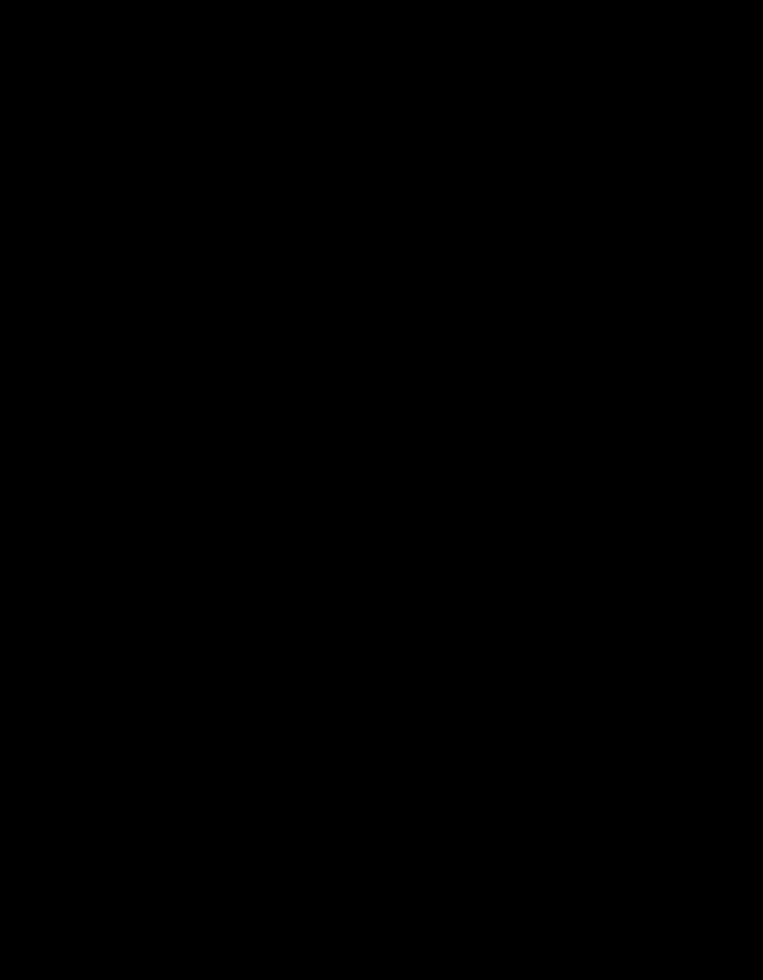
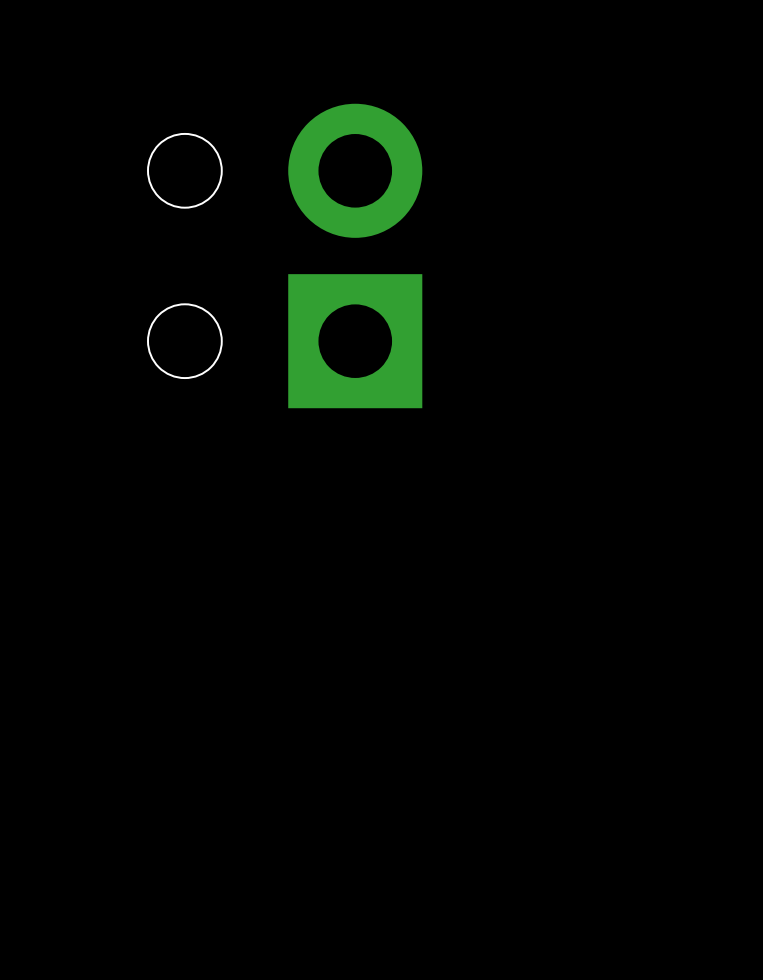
part: none -> (285, 255)

